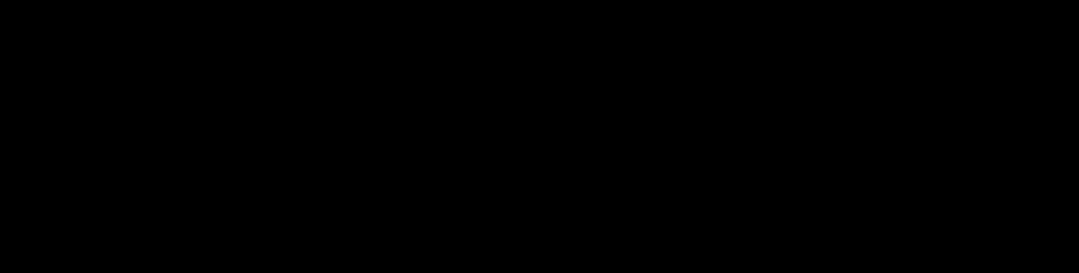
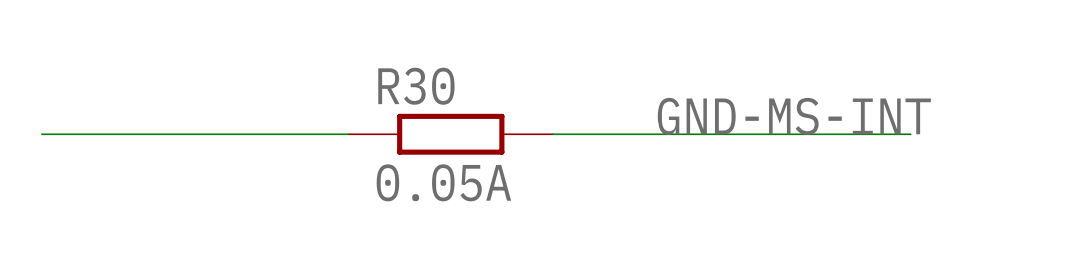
label: none -> GND-MS-INT (794, 116)
wire: none -> (41, 134) (348, 134)
R30: none -> 0.05A (450, 134)
wire: none -> (552, 134) (910, 134)

